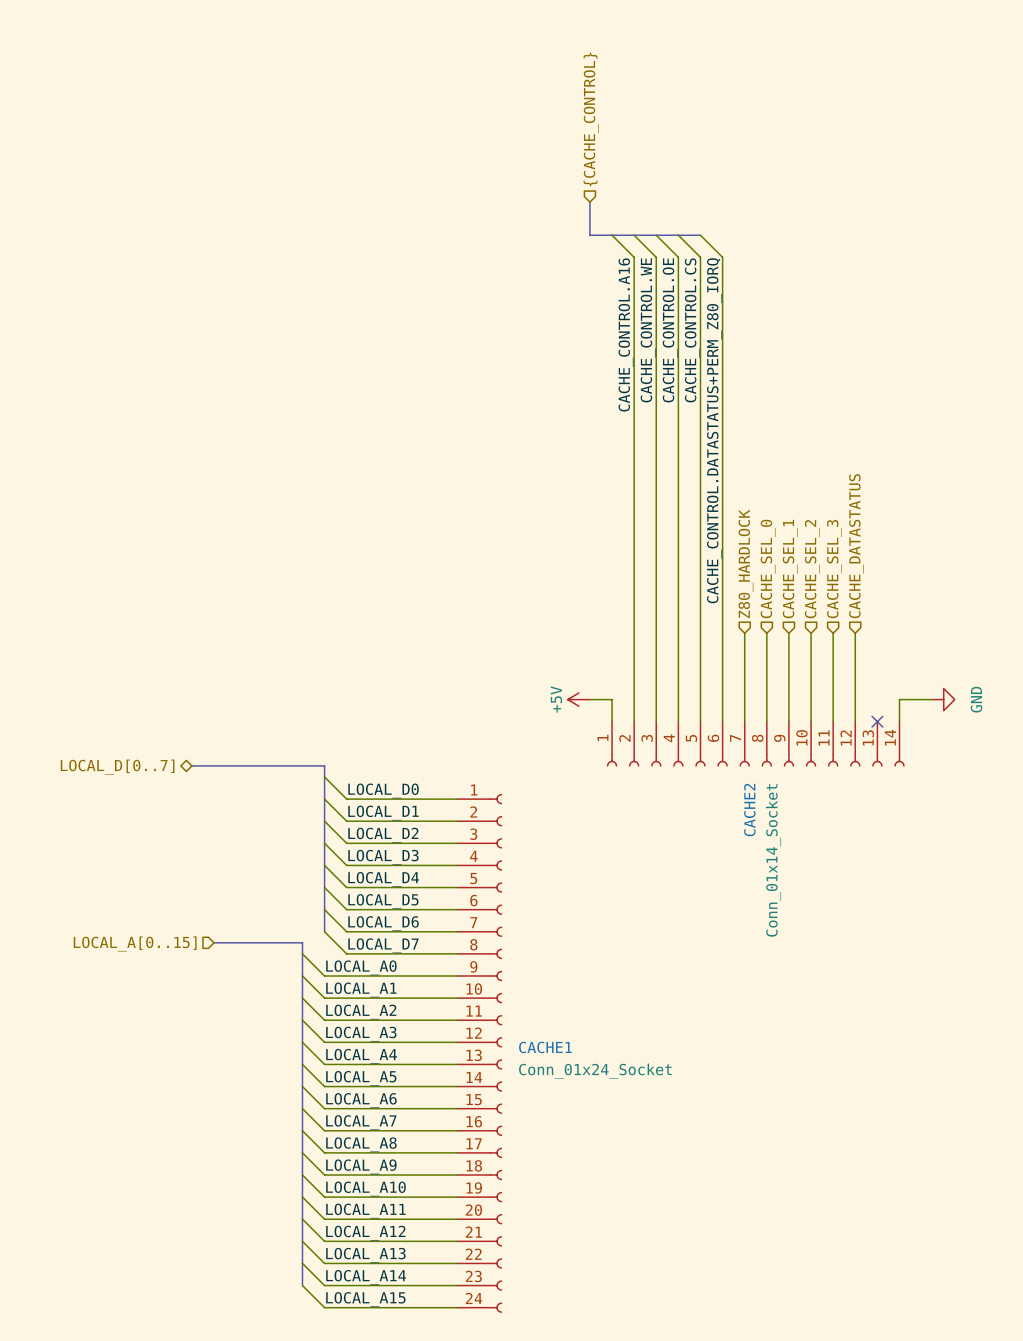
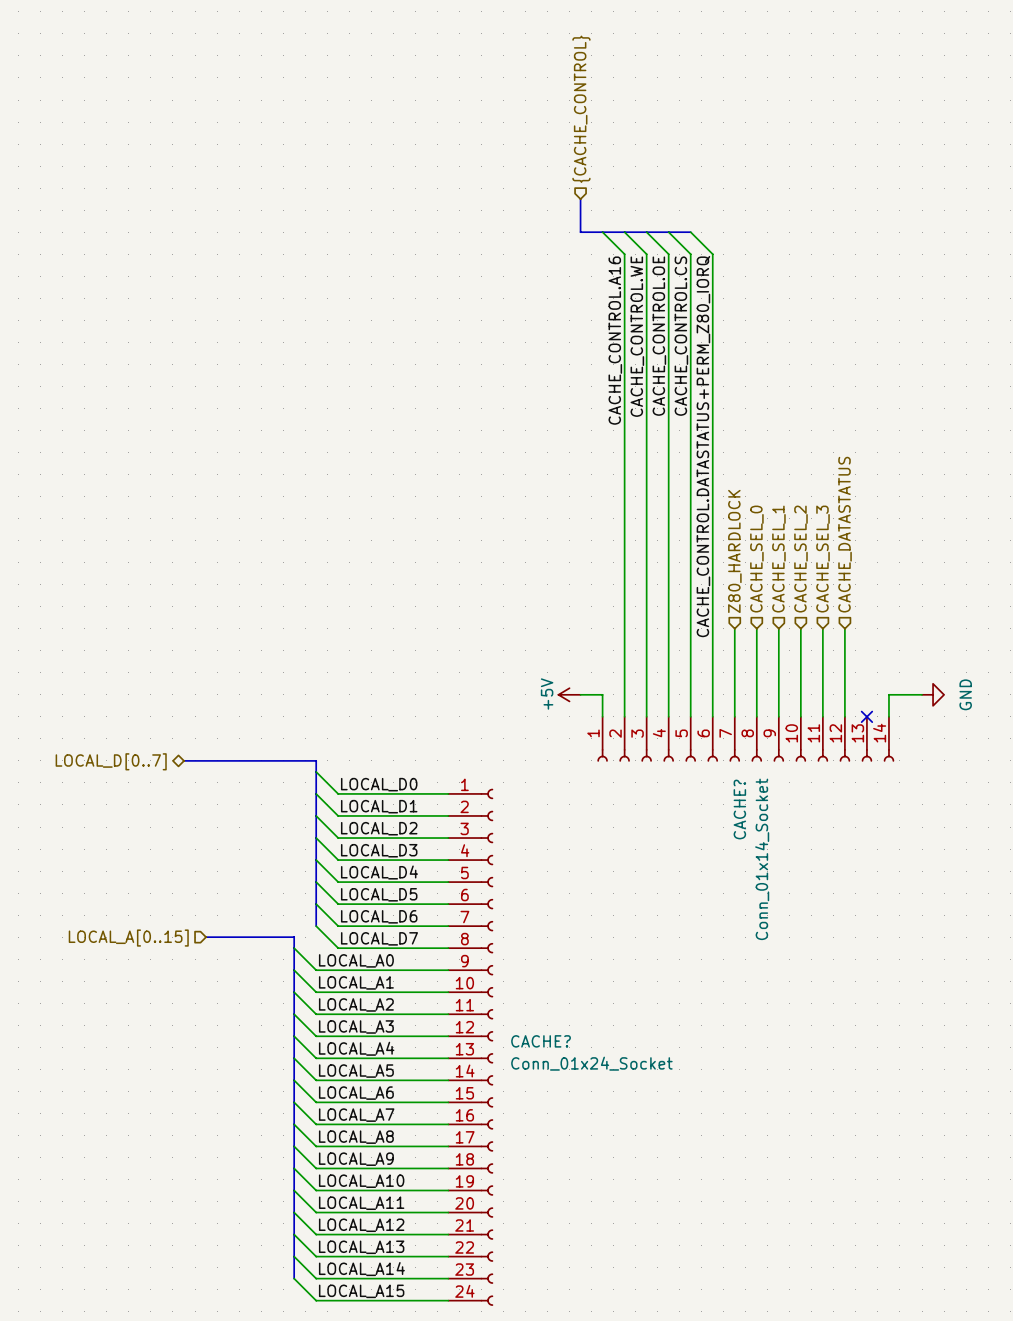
CACHE2 name: CACHE2 (749, 810) -> CACHE? (739, 809)
CACHE1 name: CACHE1 (545, 1047) -> CACHE? (541, 1041)

